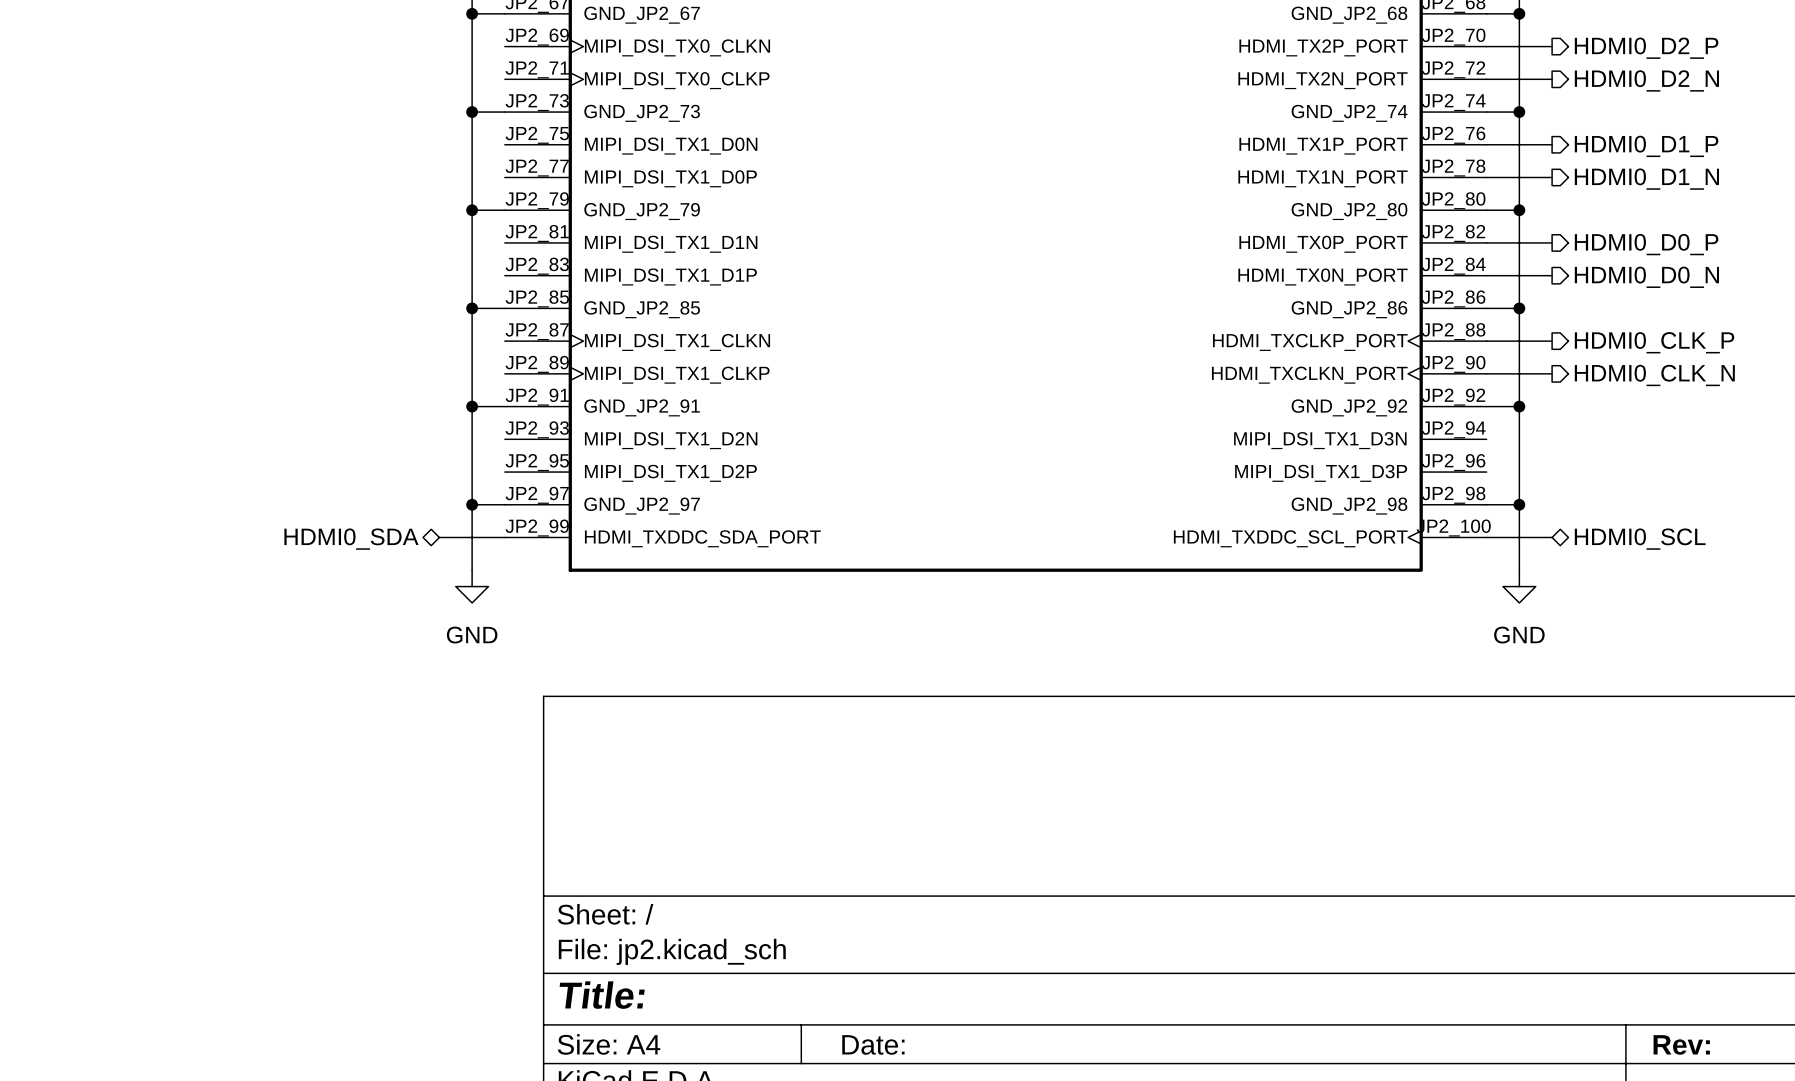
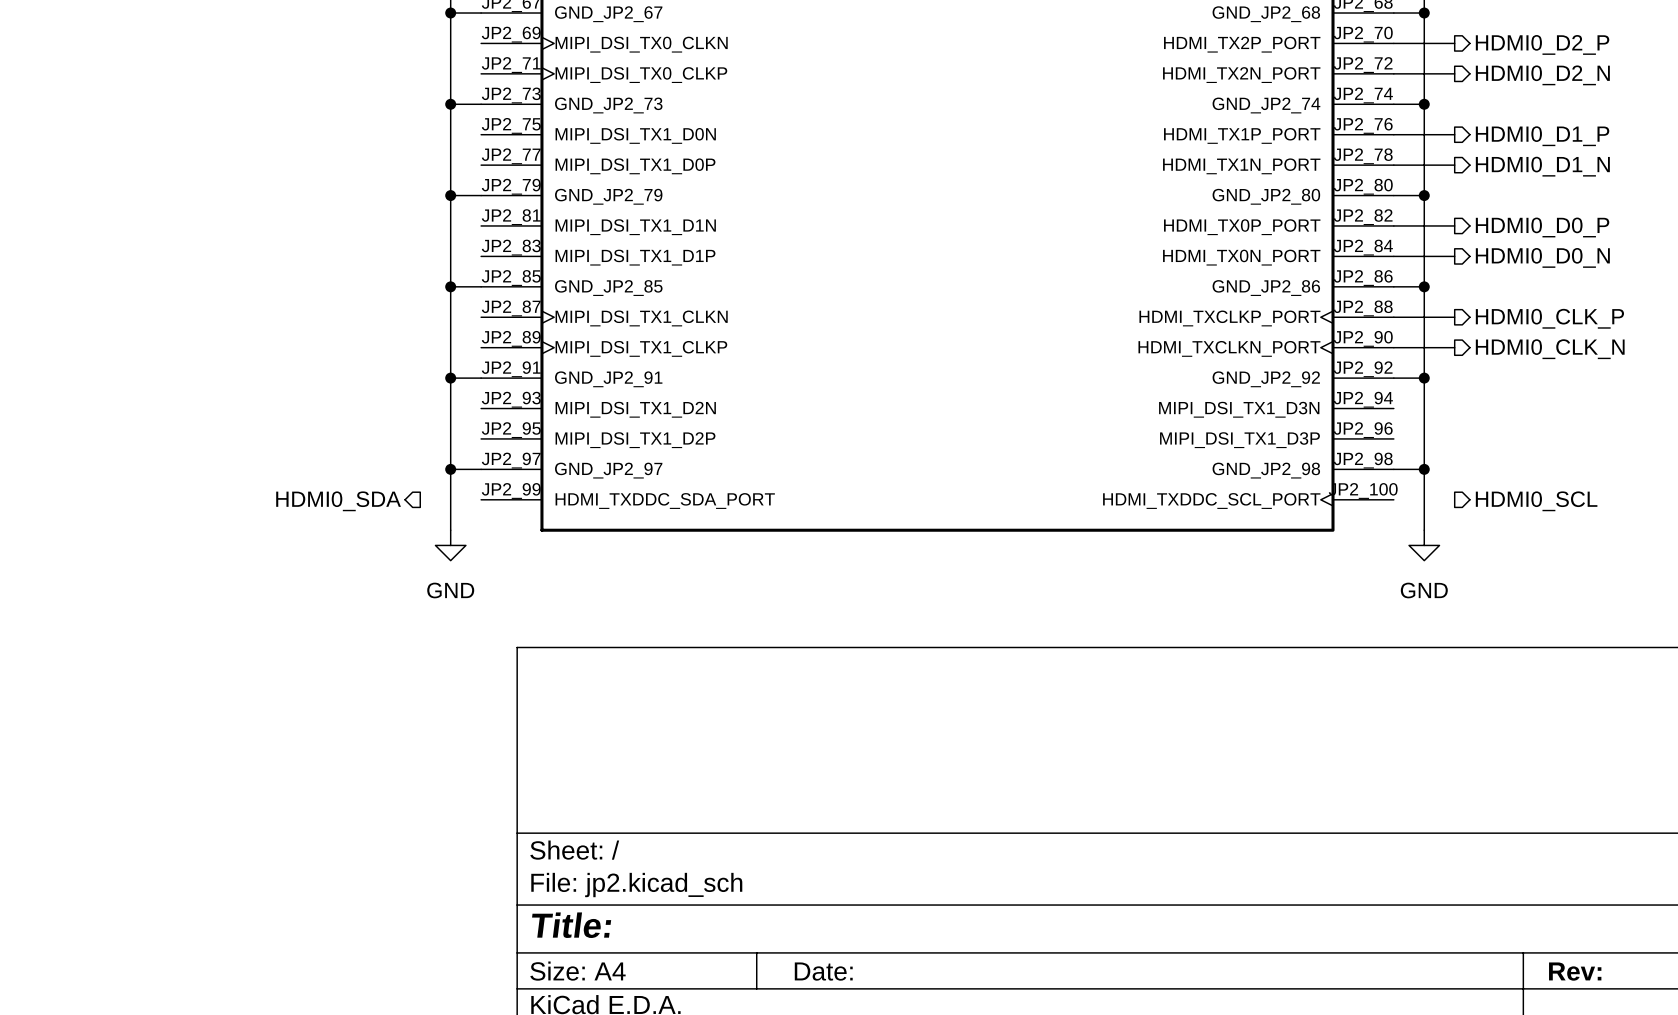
wire: (439, 537) (504, 537) -> none
wire: (1486, 537) (1552, 537) -> none
hierarchical label shape: bidirectional (351, 539) -> output (338, 501)
hierarchical label shape: bidirectional (1640, 539) -> output (1536, 501)

